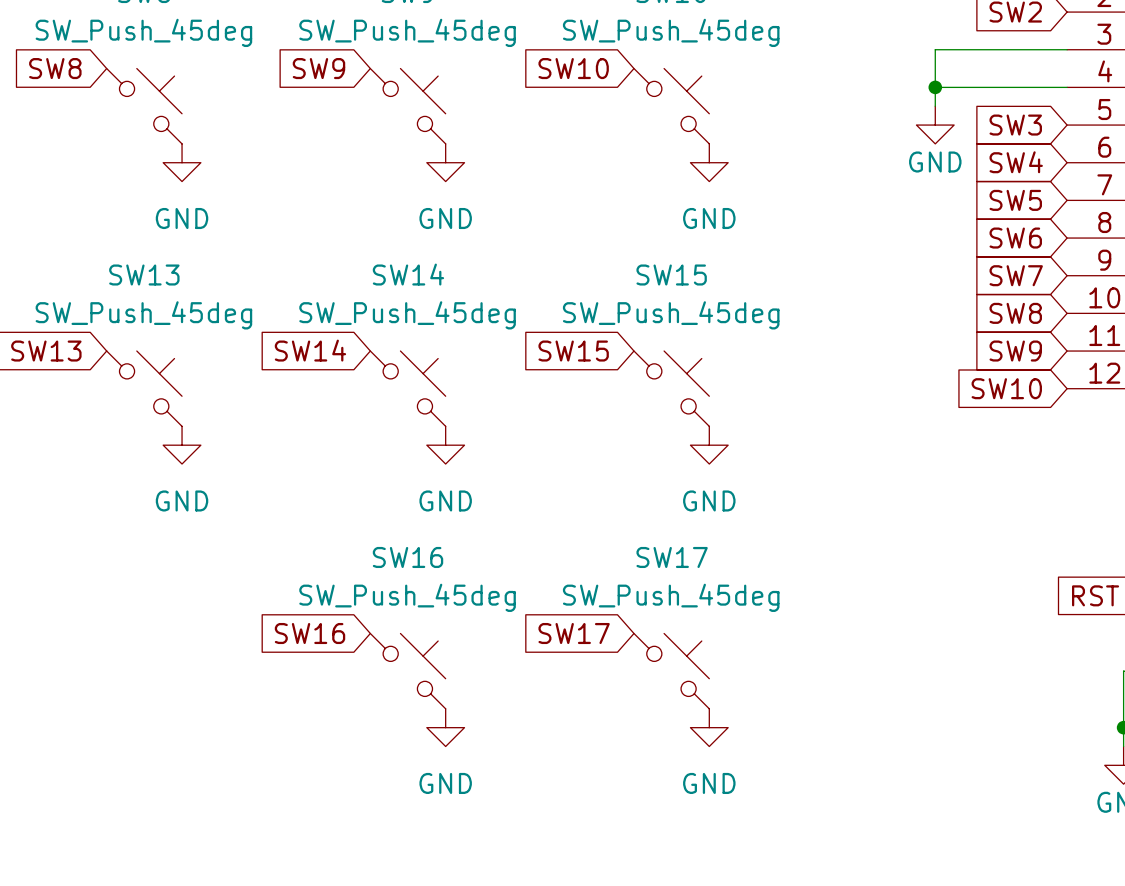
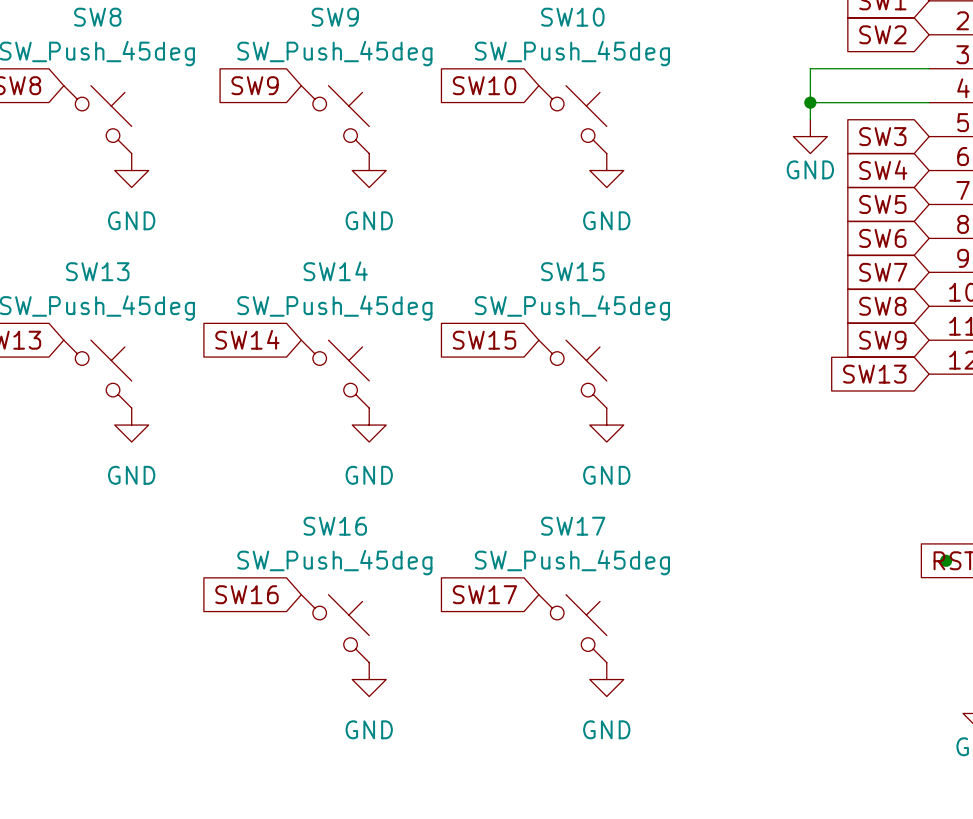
global label: SW10 (1006, 388) -> SW13 (874, 374)
junction: none -> (946, 560)

